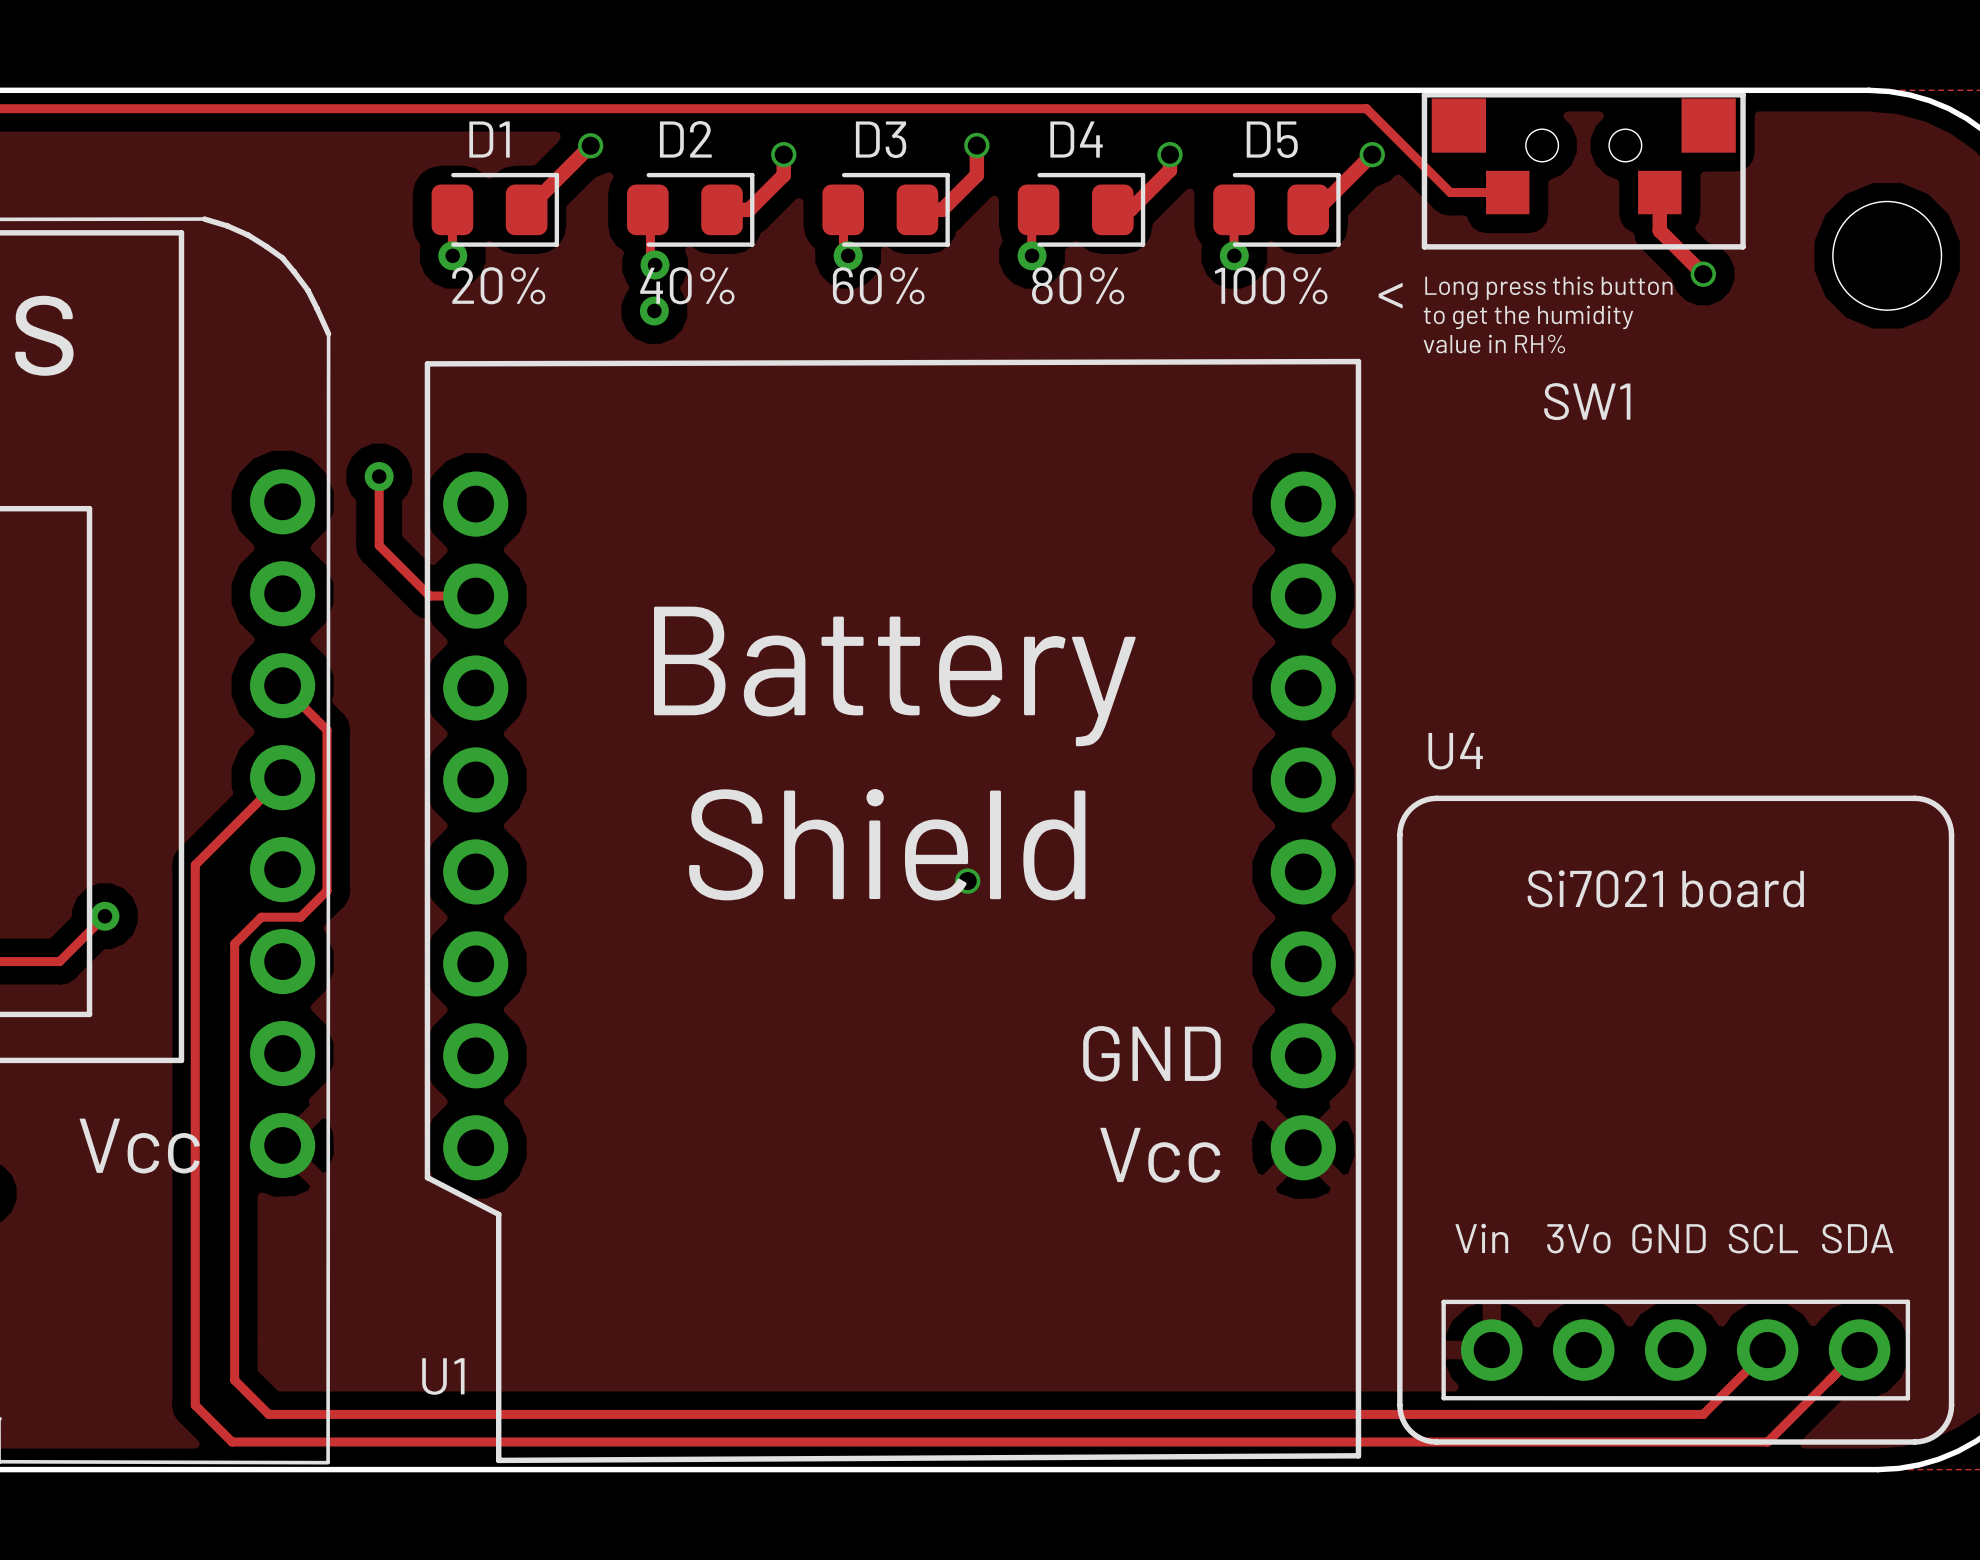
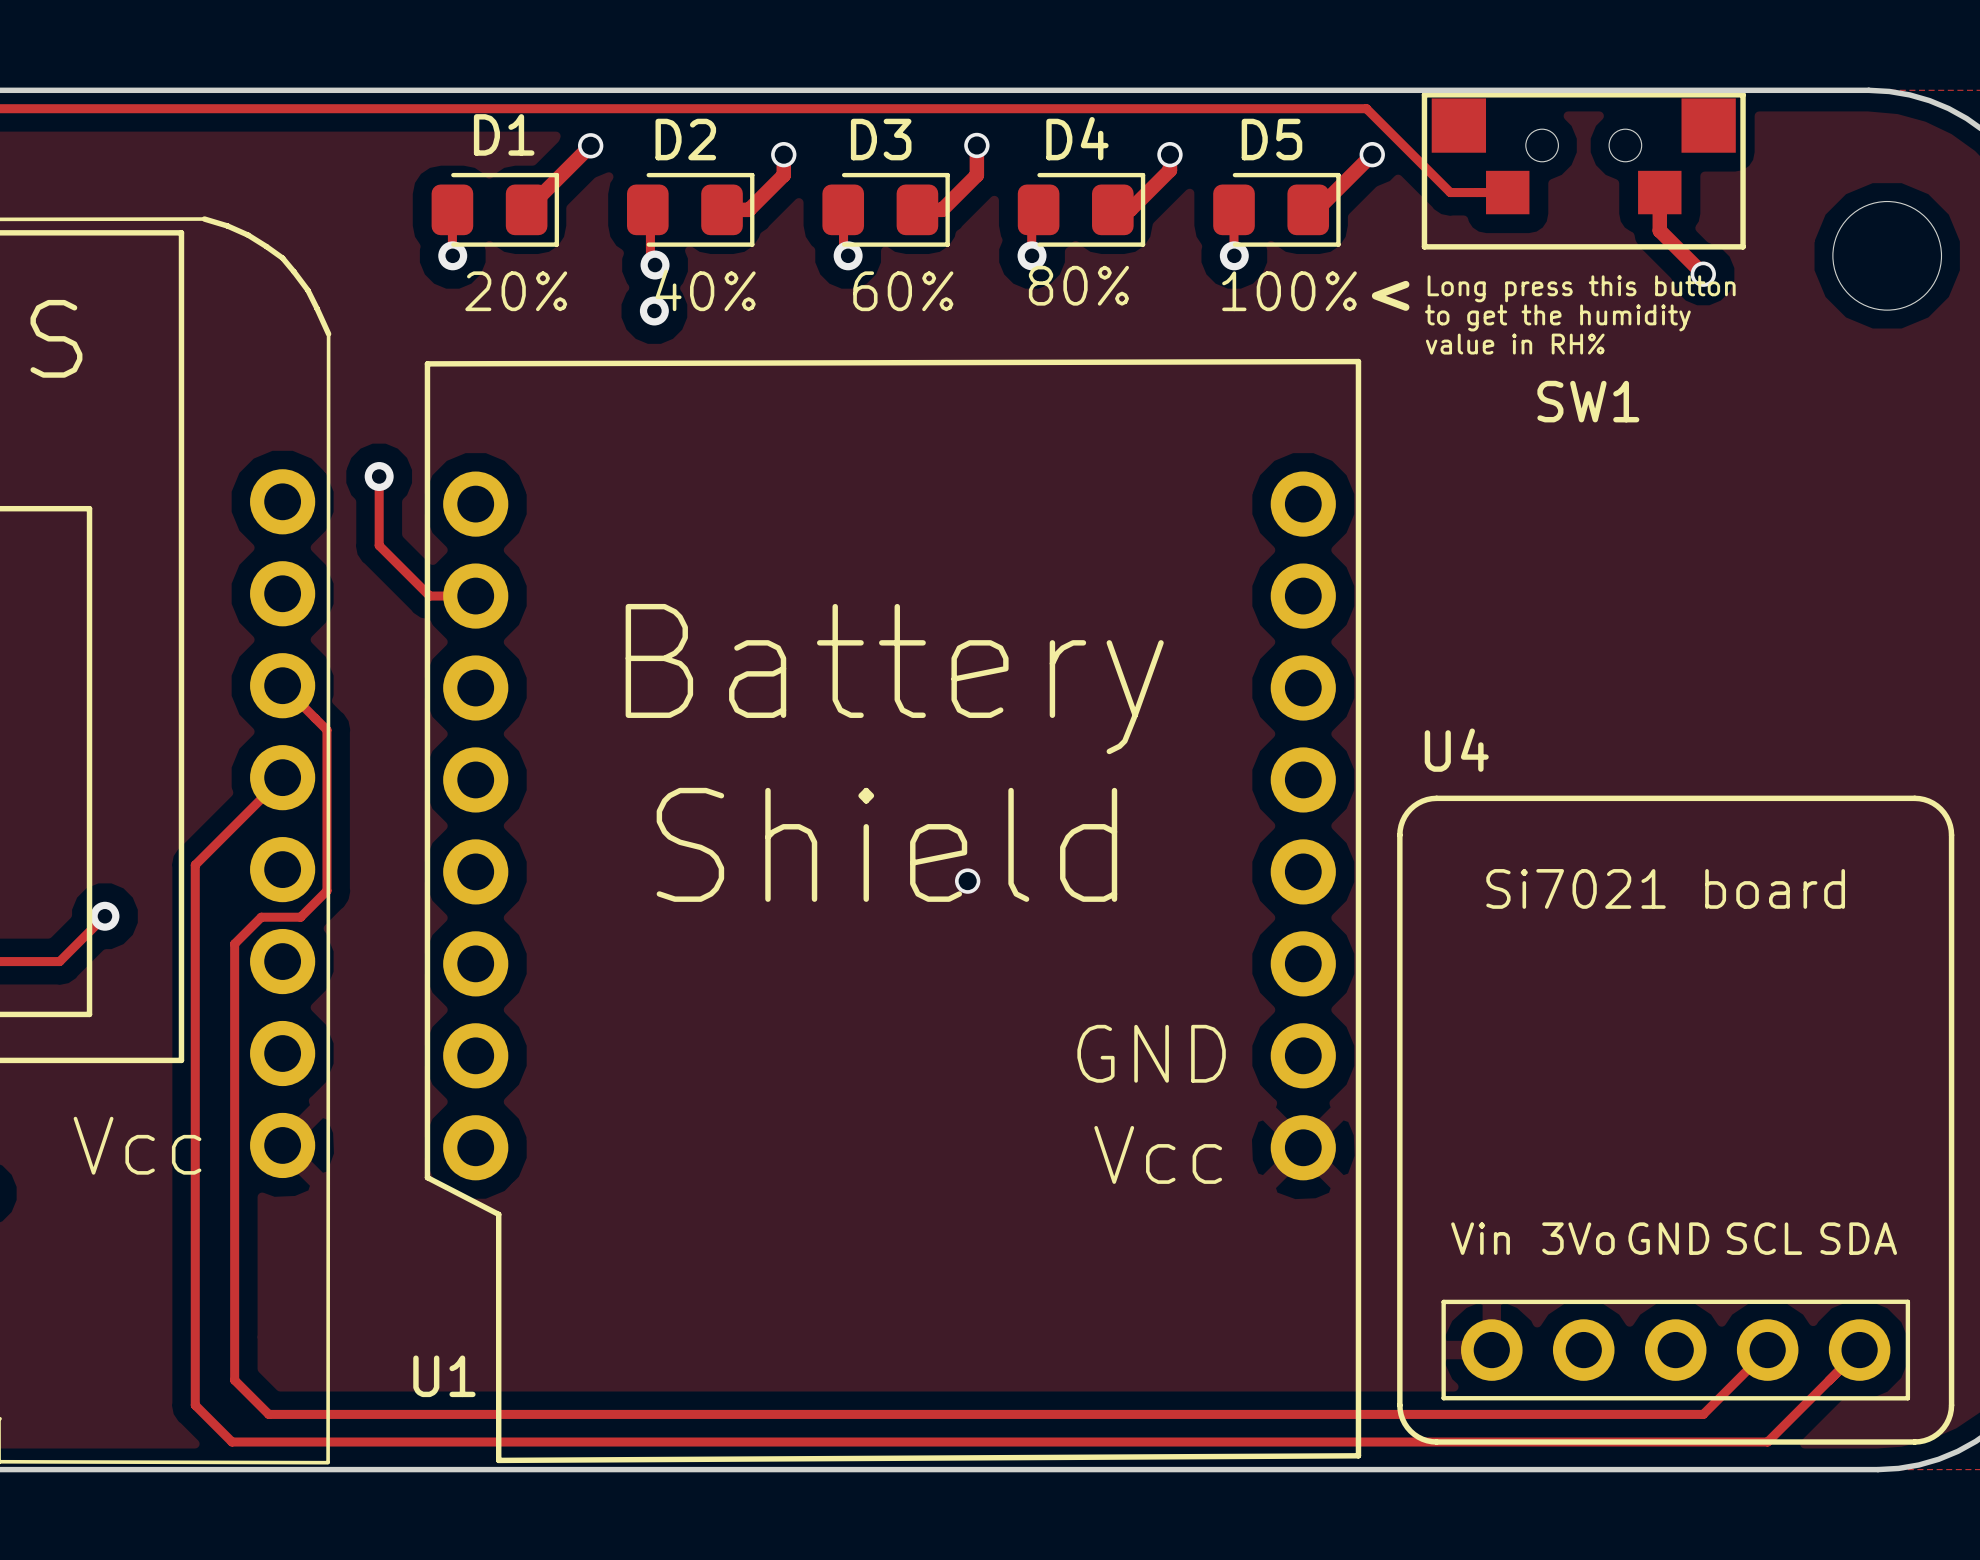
D1 name position: D1 (489, 139) -> D1 (504, 134)
text position: 20% (498, 285) -> 20% (516, 291)
text position: 40% (687, 285) -> 40% (705, 290)
text position: 60% (878, 285) -> 60% (903, 291)
text position: 100% (1271, 285) -> 100% (1289, 291)

